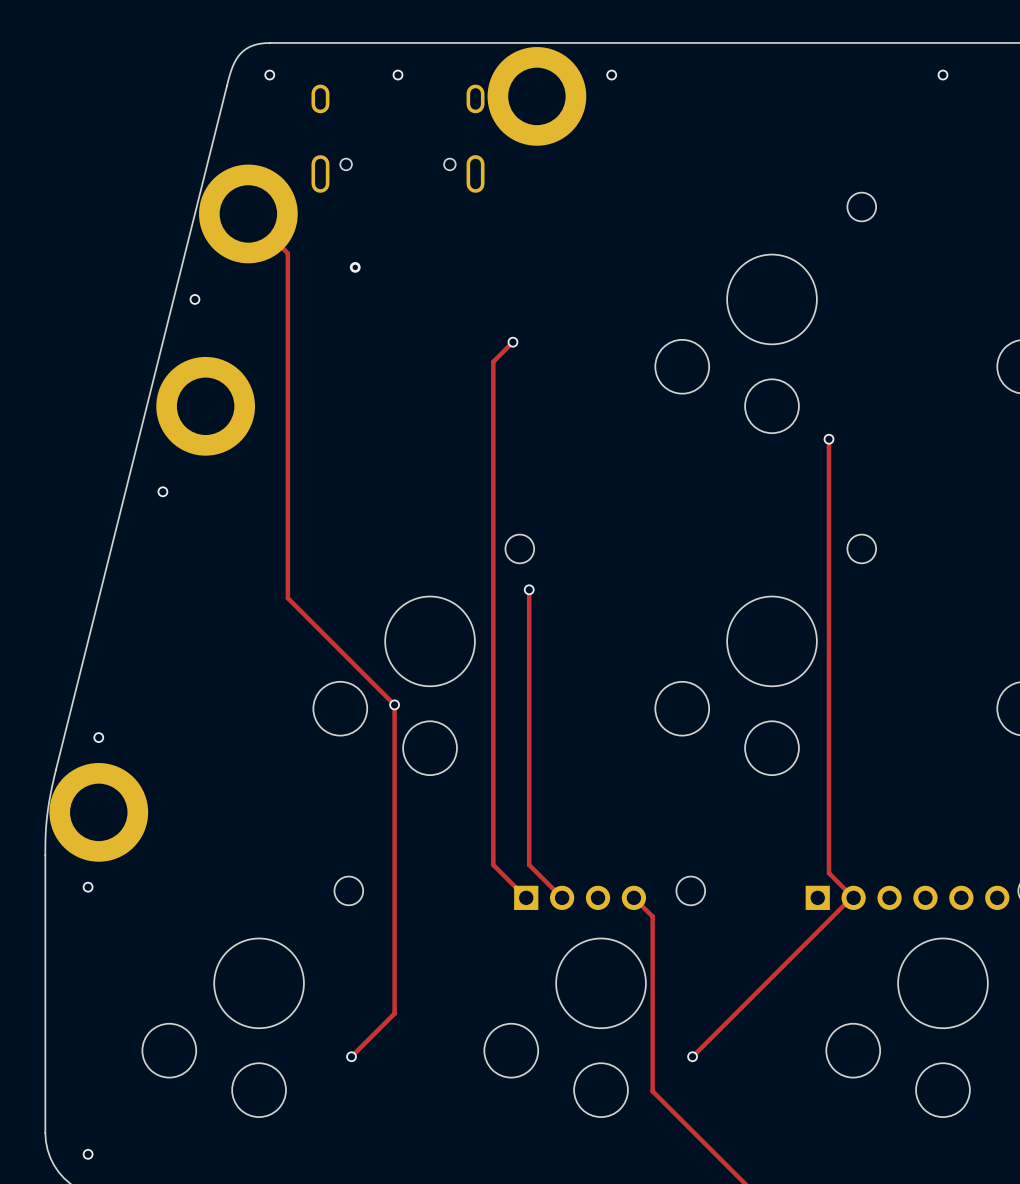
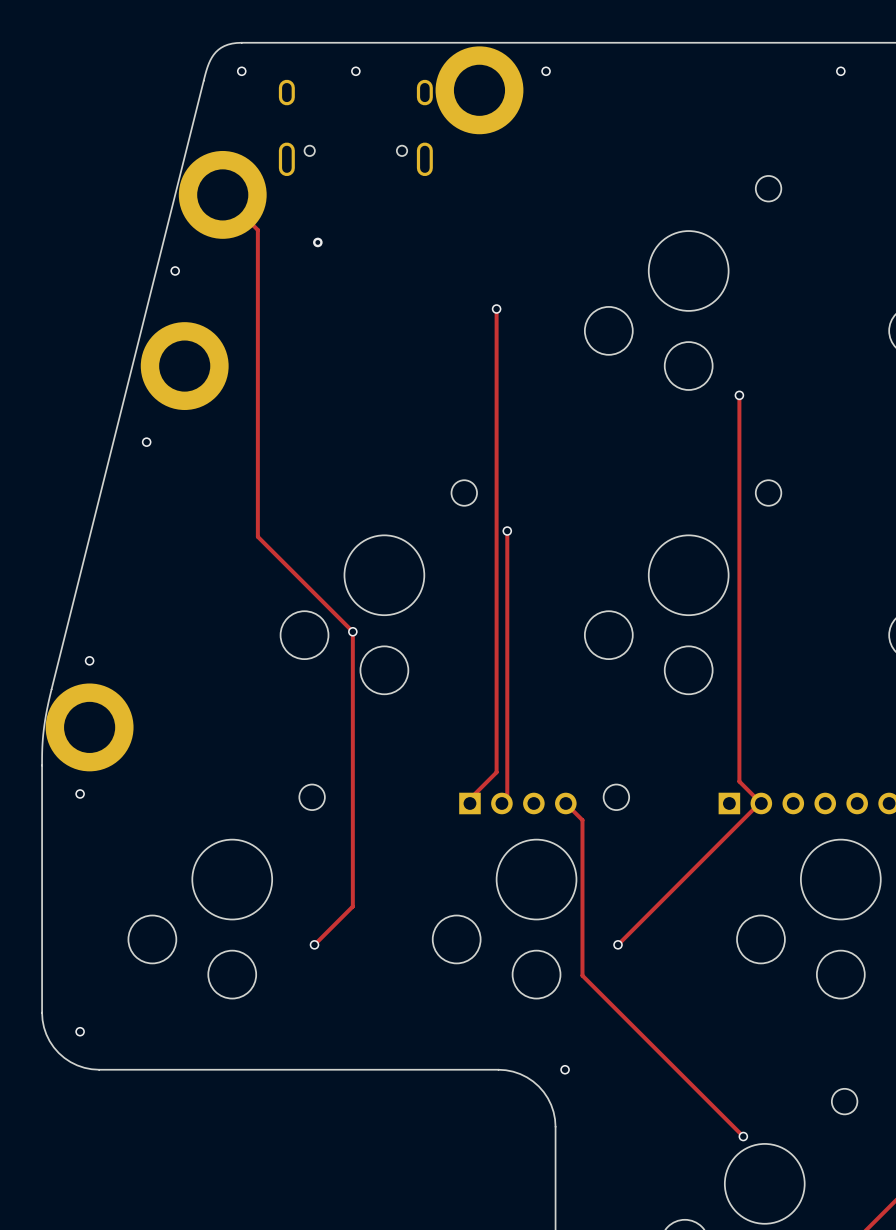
track: (512, 342) (493, 361) (493, 864) (526, 897) -> (496, 309) (496, 772) (469, 798) (469, 803)
via position: (512, 342) -> (496, 309)
track: (529, 589) (529, 864) (562, 897) -> (507, 531) (507, 798) (501, 803)
via position: (529, 589) -> (507, 531)

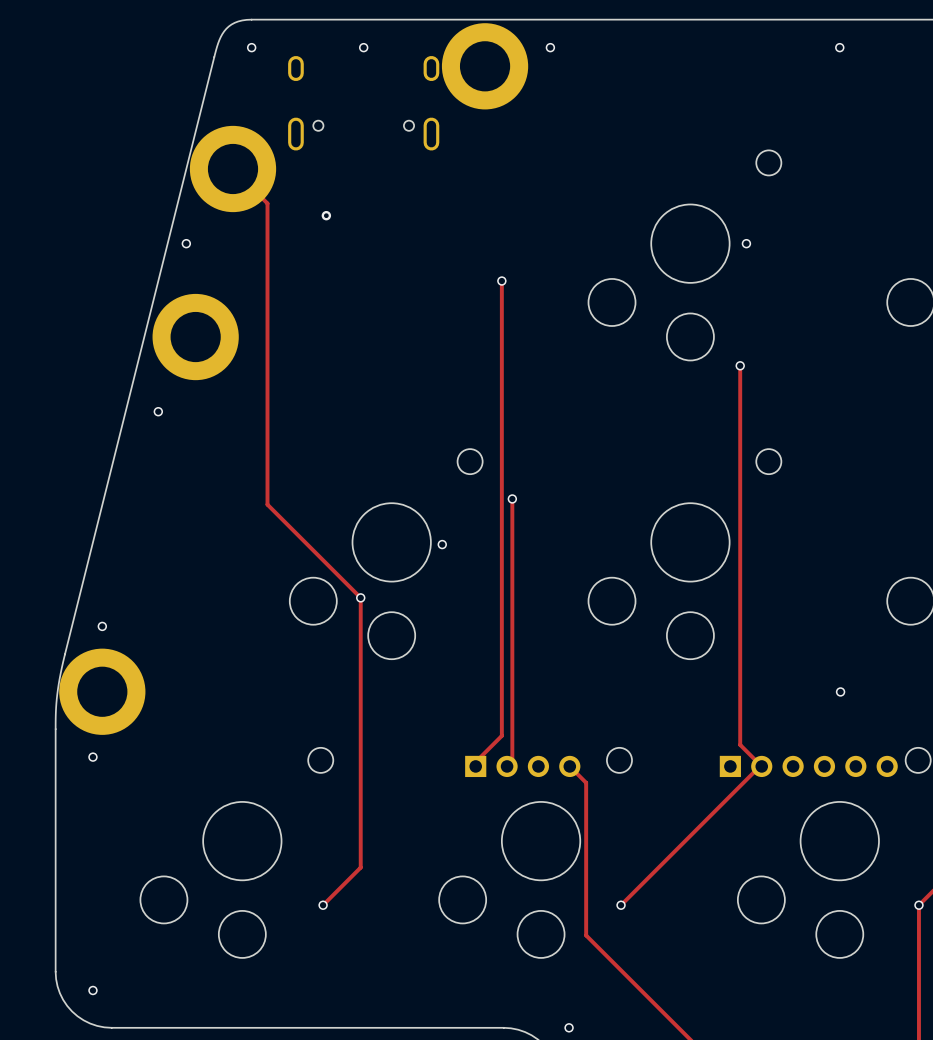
via: none -> (746, 243)
via: none -> (442, 544)
via: none -> (840, 691)

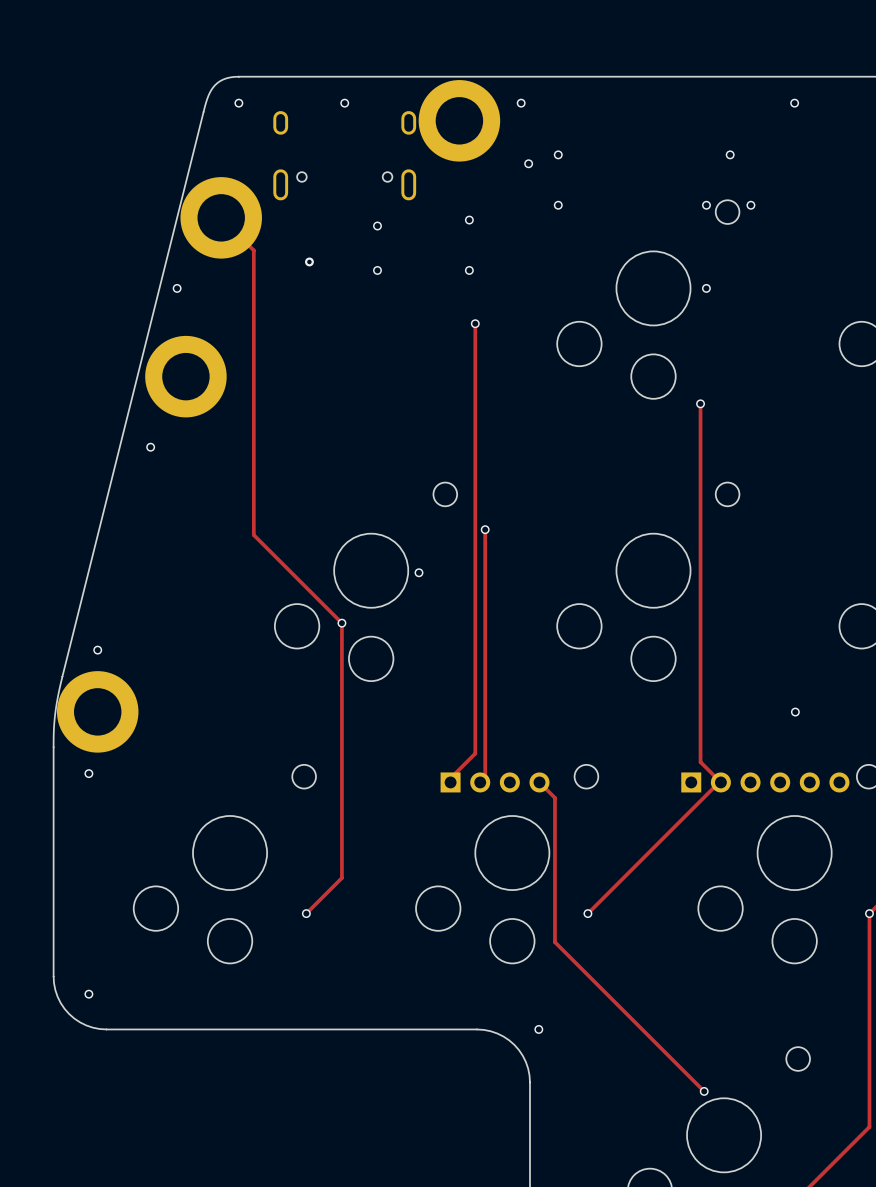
via: none -> (558, 154)
via: none -> (730, 154)
via: none -> (528, 163)
via: none -> (558, 205)
via: none -> (706, 205)
via: none -> (750, 205)
via: none -> (469, 220)
via: none -> (377, 226)
via: none -> (377, 270)
via: none -> (469, 270)

